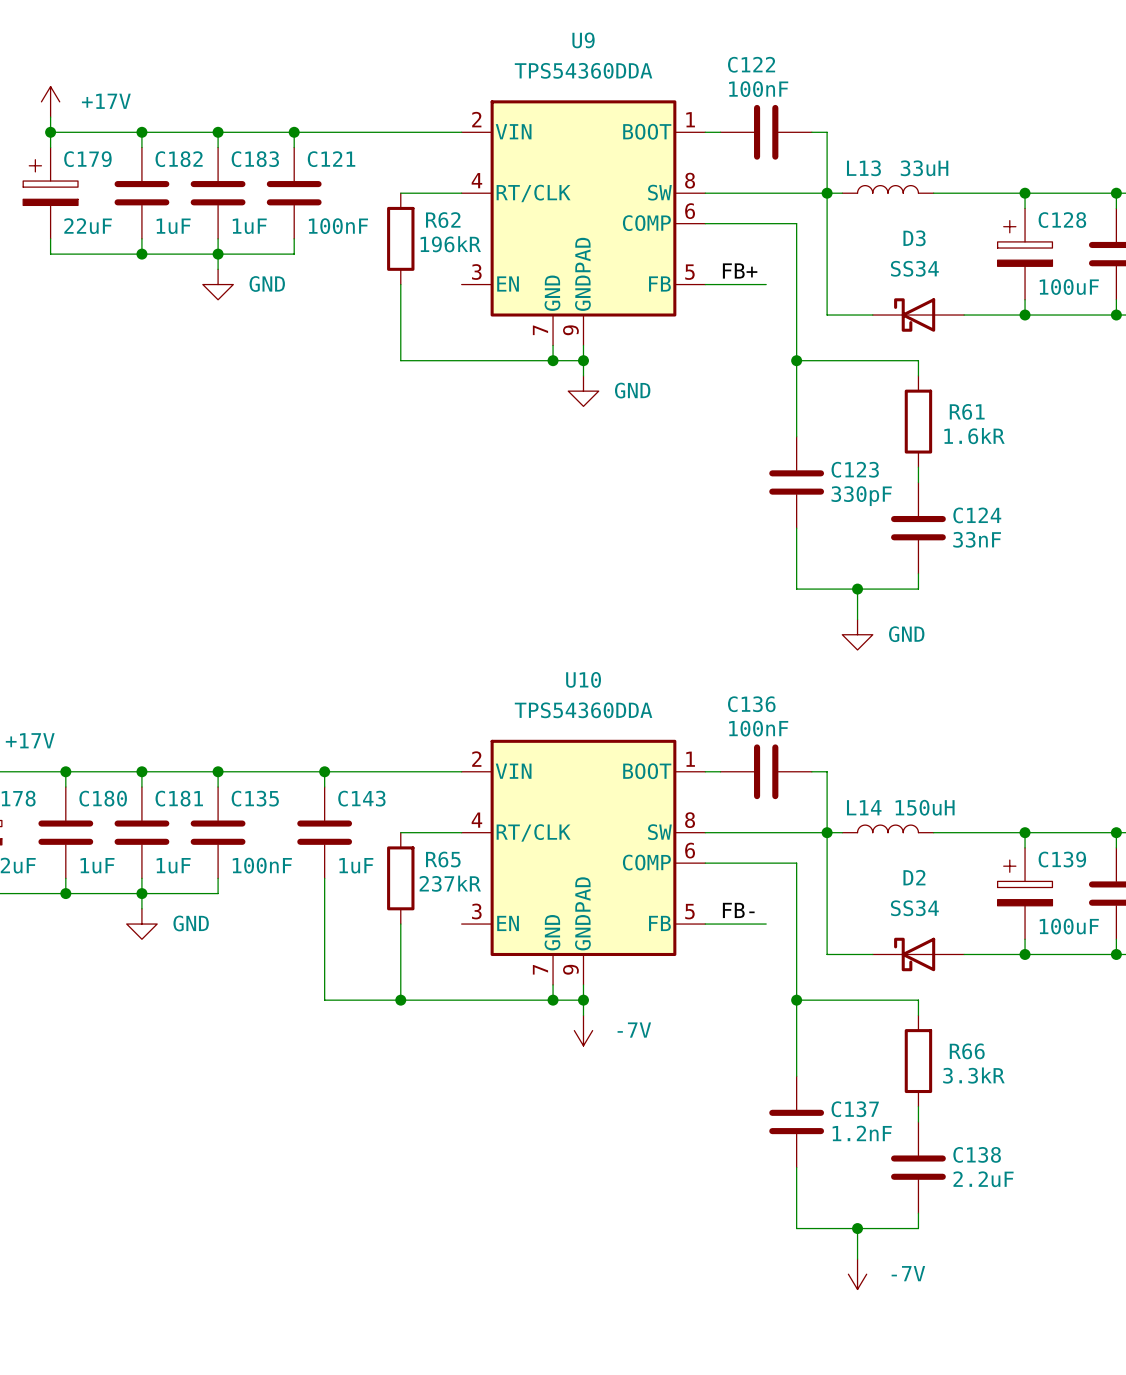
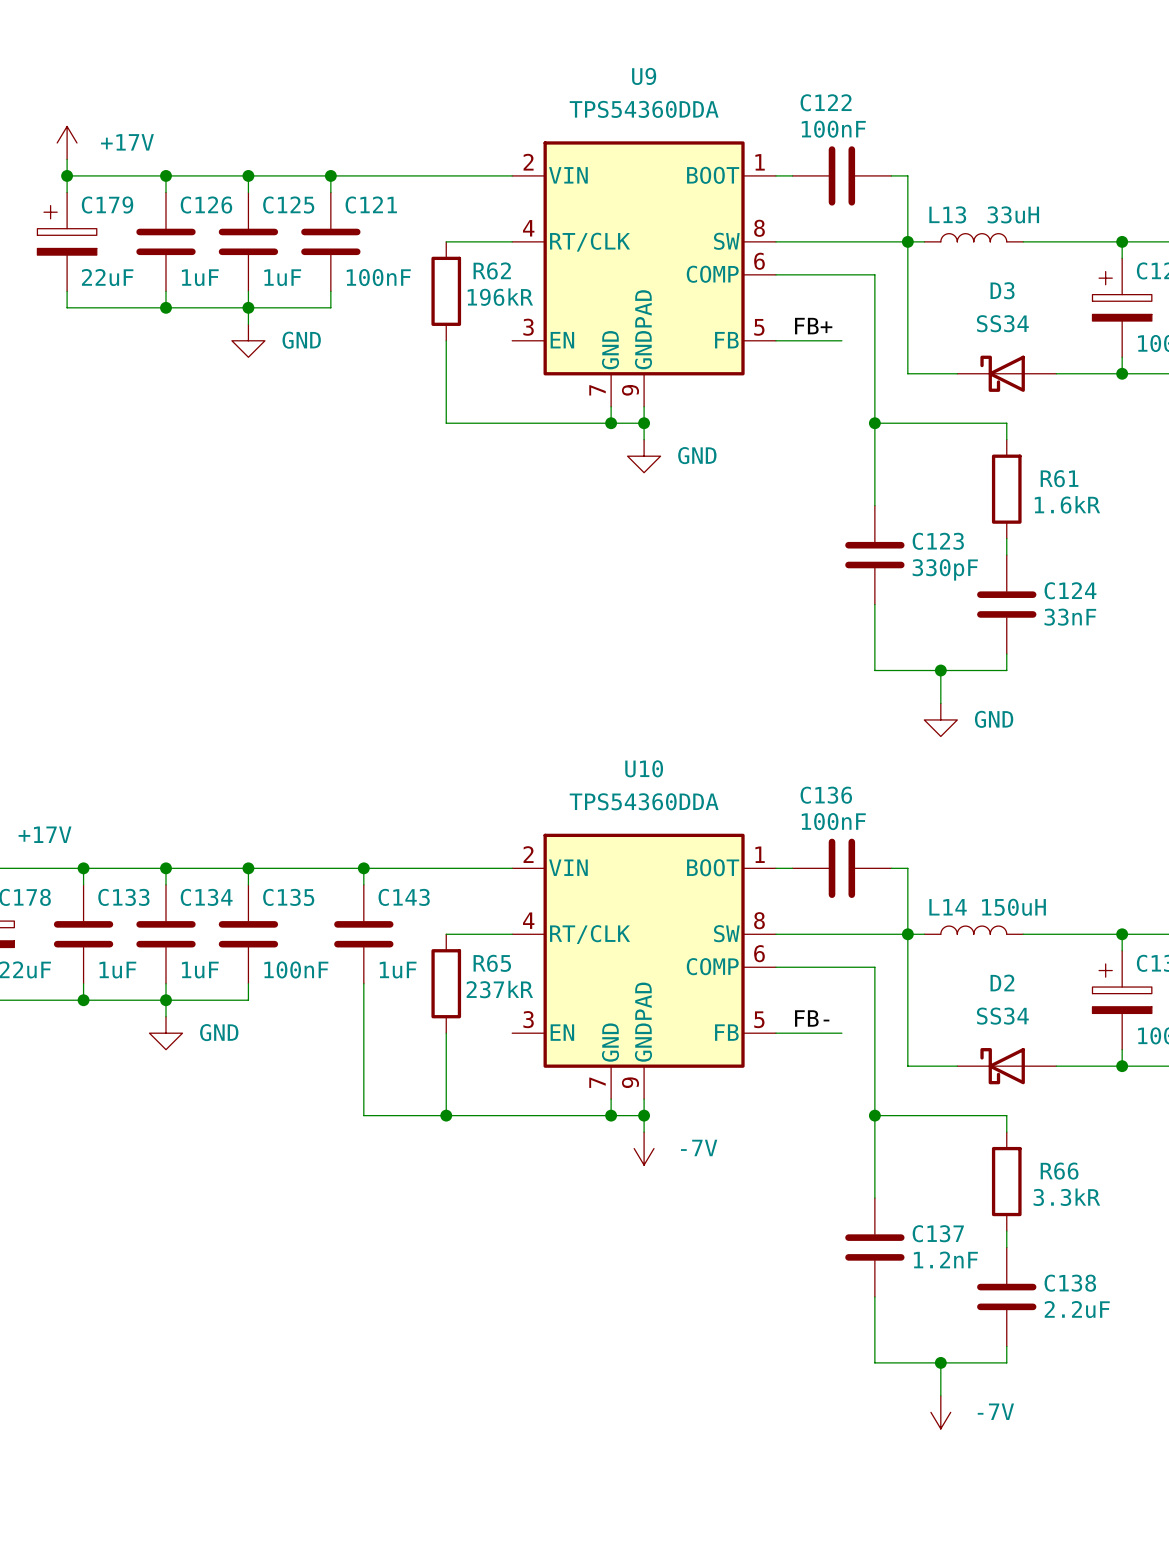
C182 name: C182 (179, 159) -> C126 (206, 205)
C183 name: C183 (255, 159) -> C125 (288, 205)
C180 name: C180 (103, 798) -> C133 (123, 897)
C181 name: C181 (179, 798) -> C134 (206, 897)

